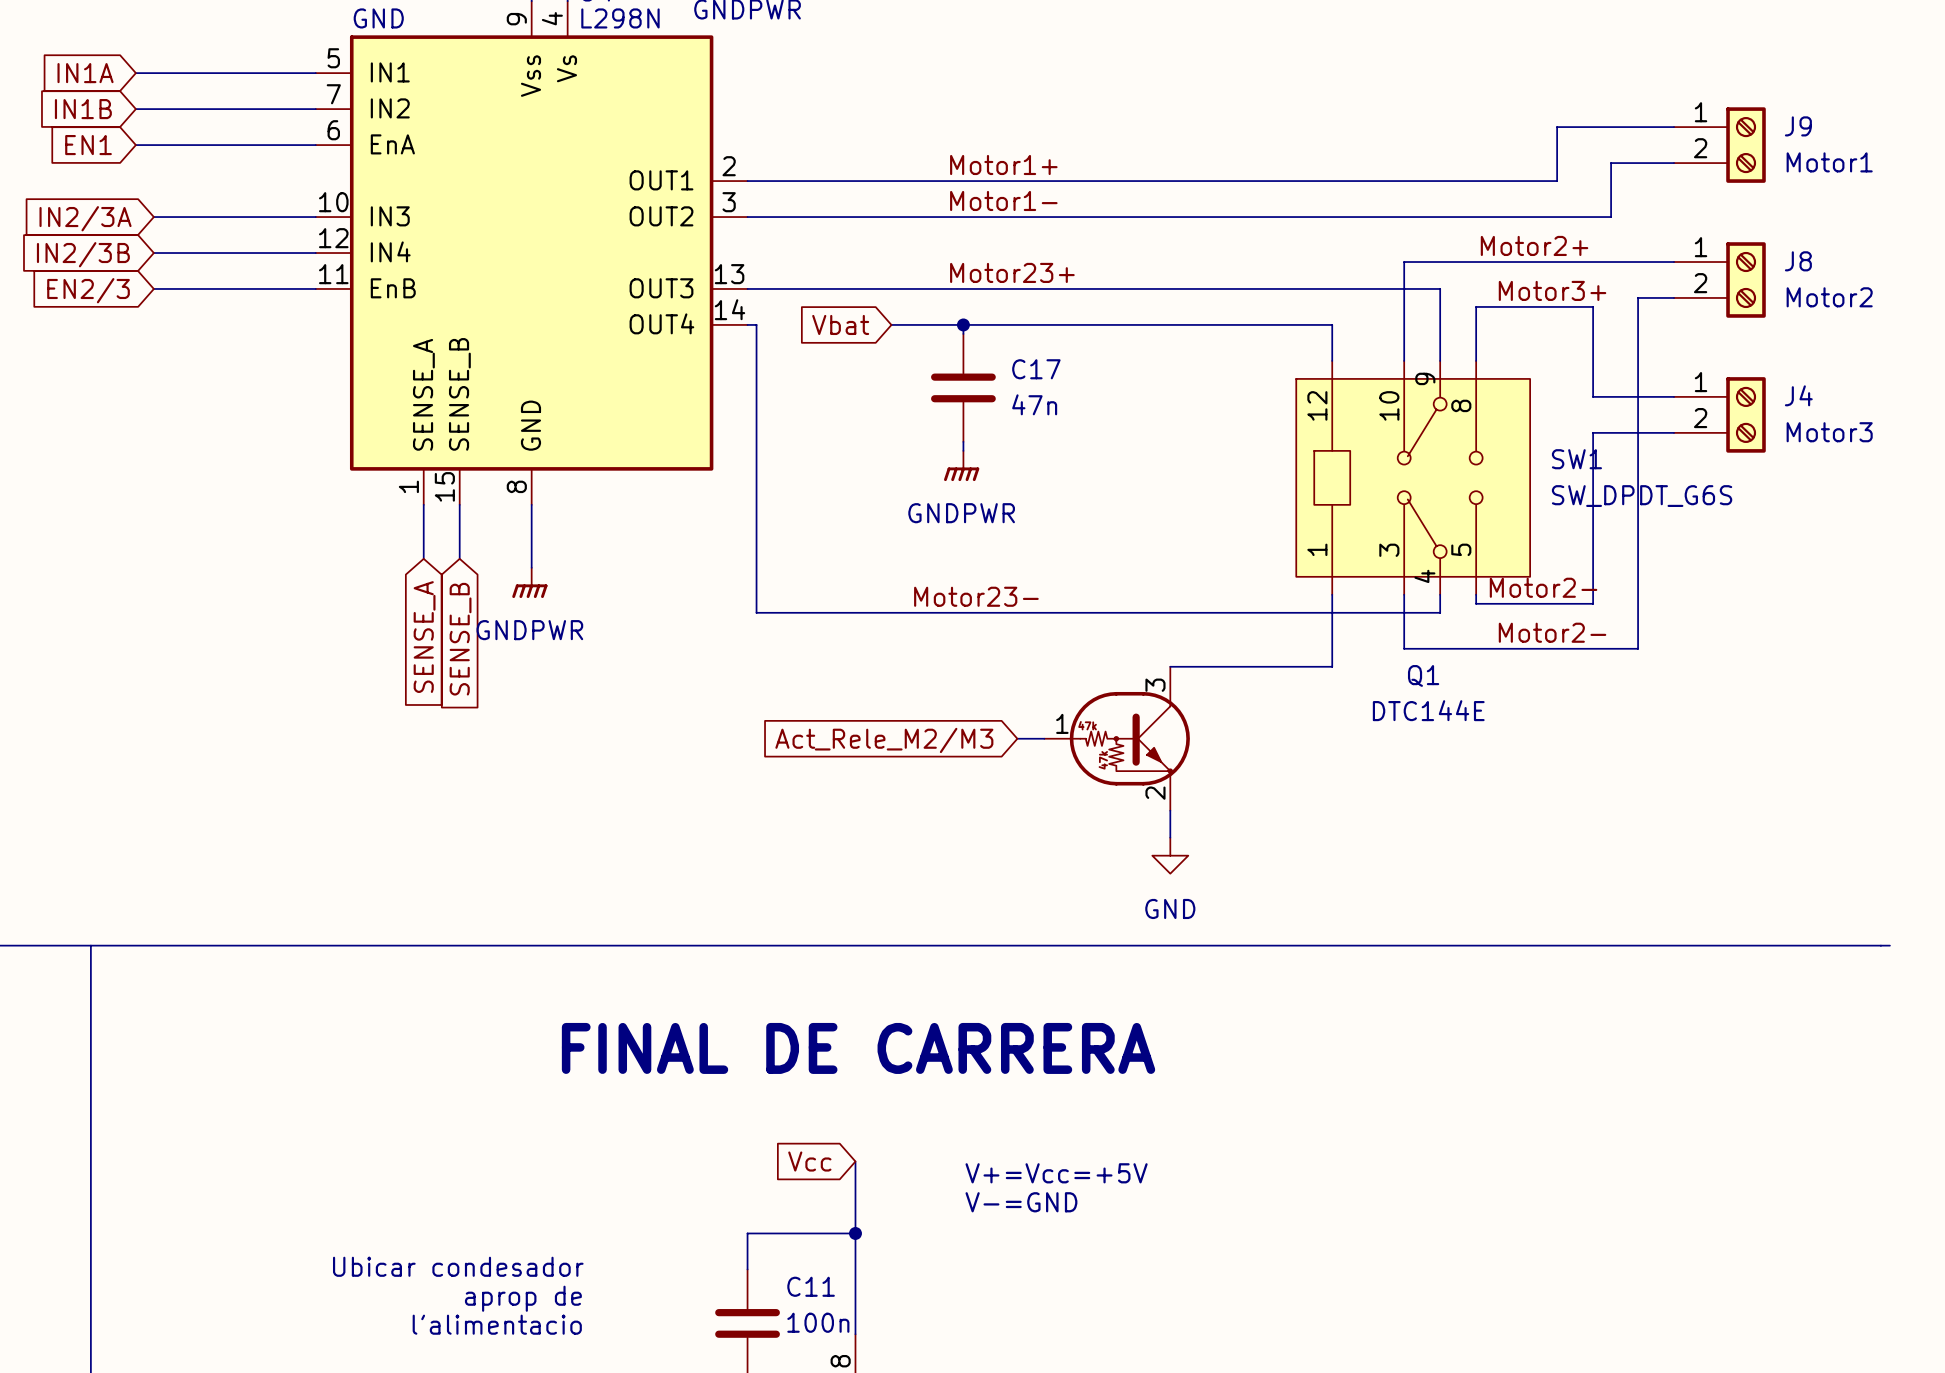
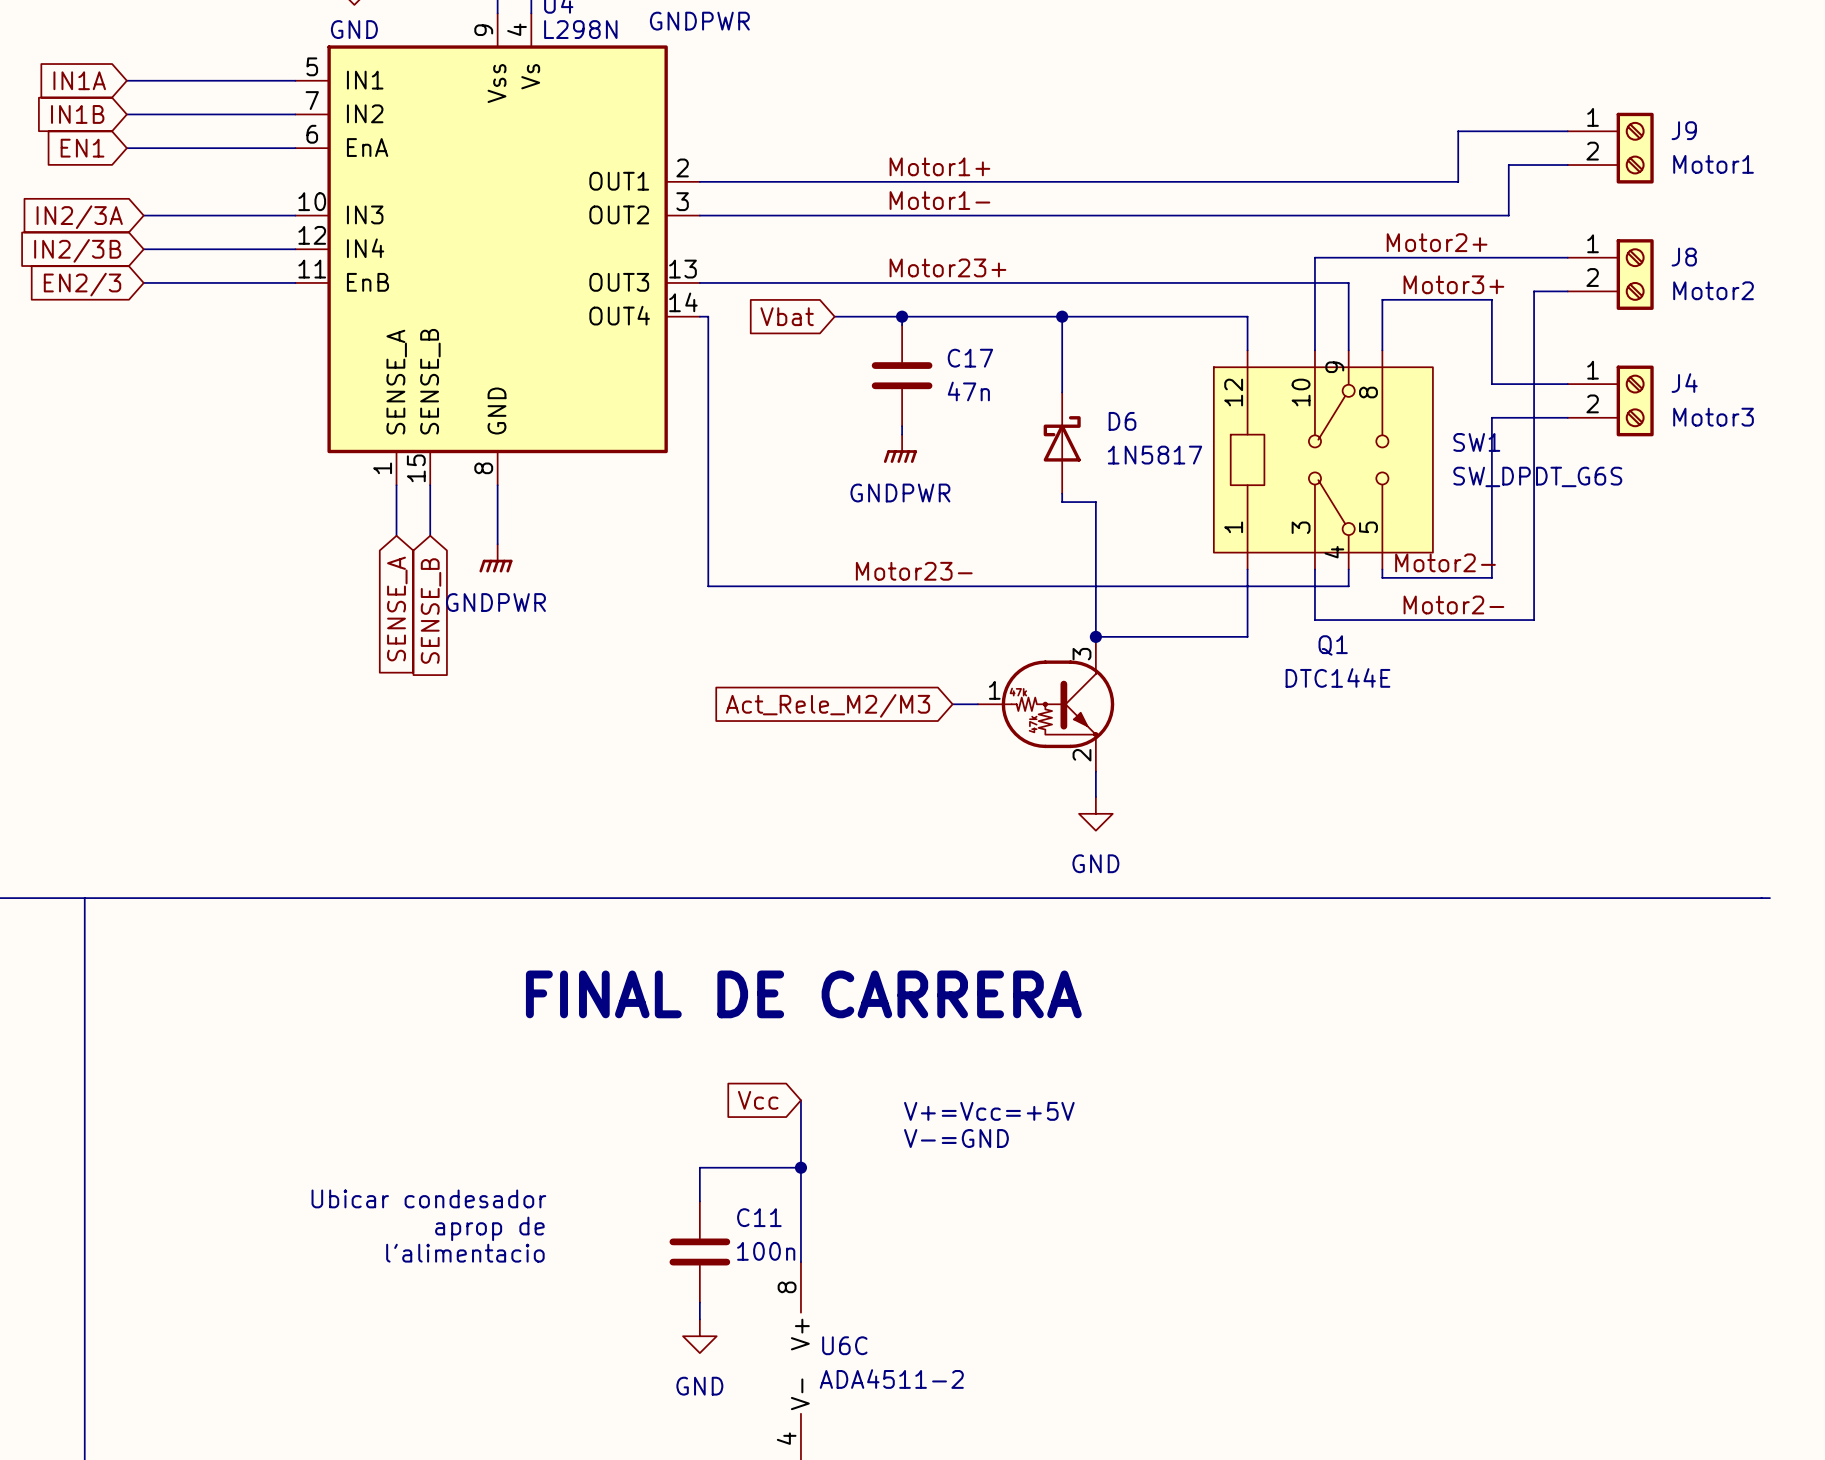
wire: none -> (1062, 316) (1062, 392)
junction: none -> (1062, 316)
D6: none -> 1N5817 (1062, 443)
wire: none -> (1062, 493) (1062, 502) (1095, 502) (1095, 636)
junction: none -> (1095, 636)

